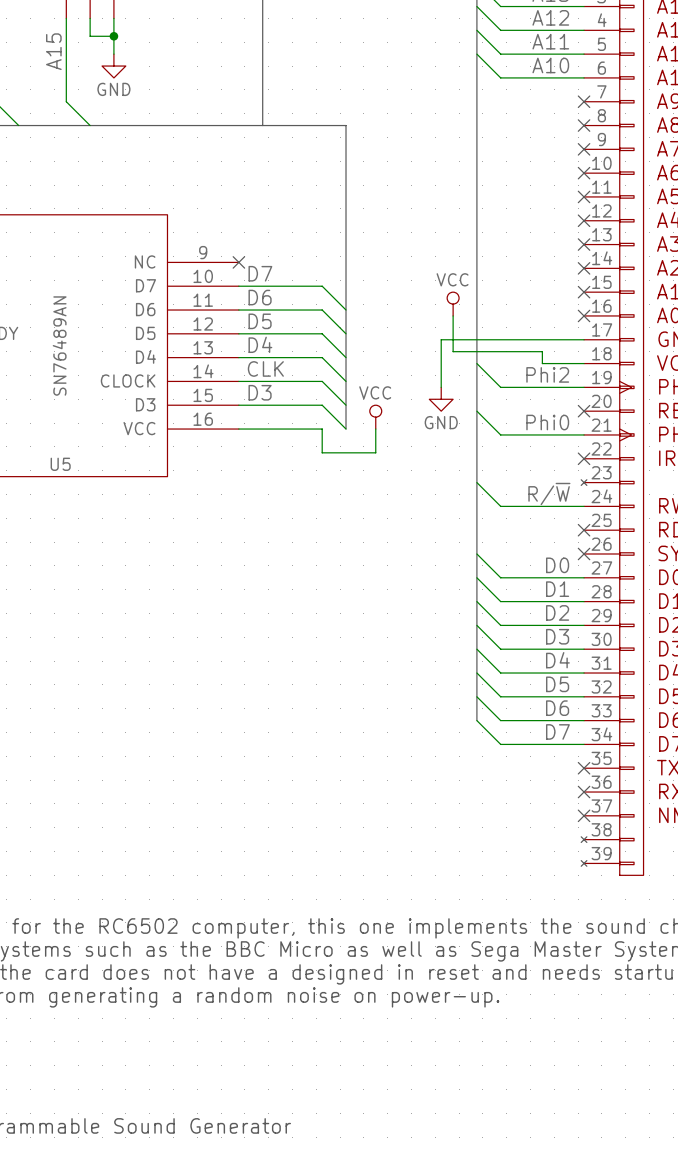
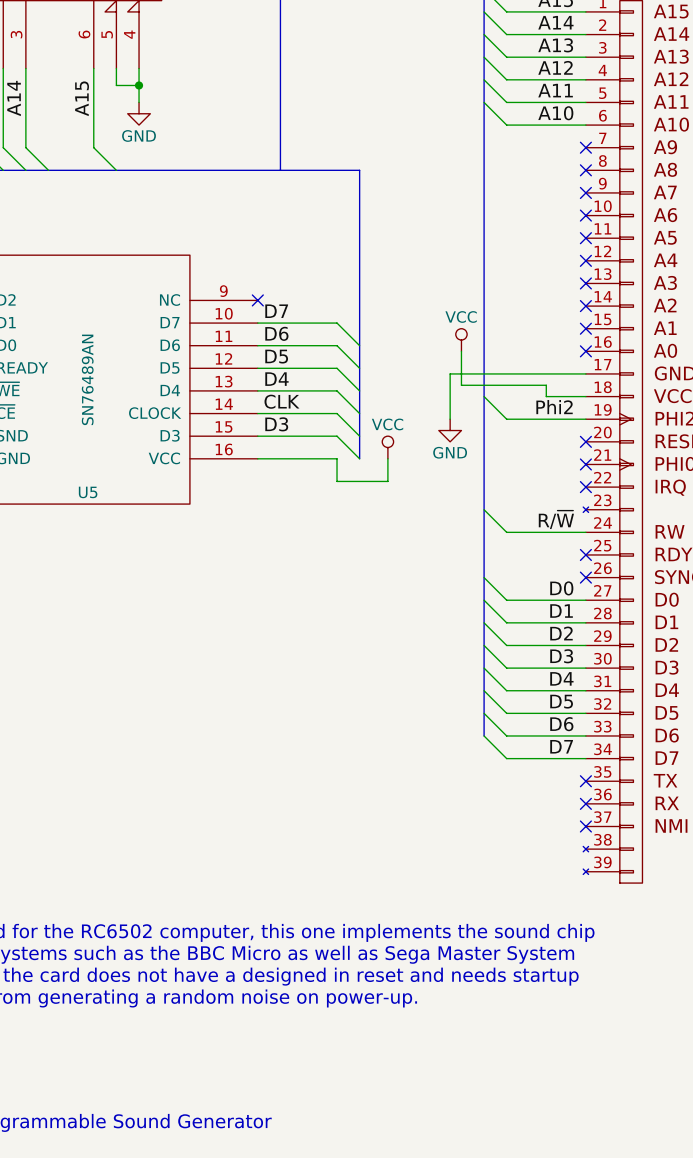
wire: (476, 411) (500, 434) (584, 434) -> none
label: Phi0 (547, 422) -> none
no-connect mark: none -> (585, 464)

